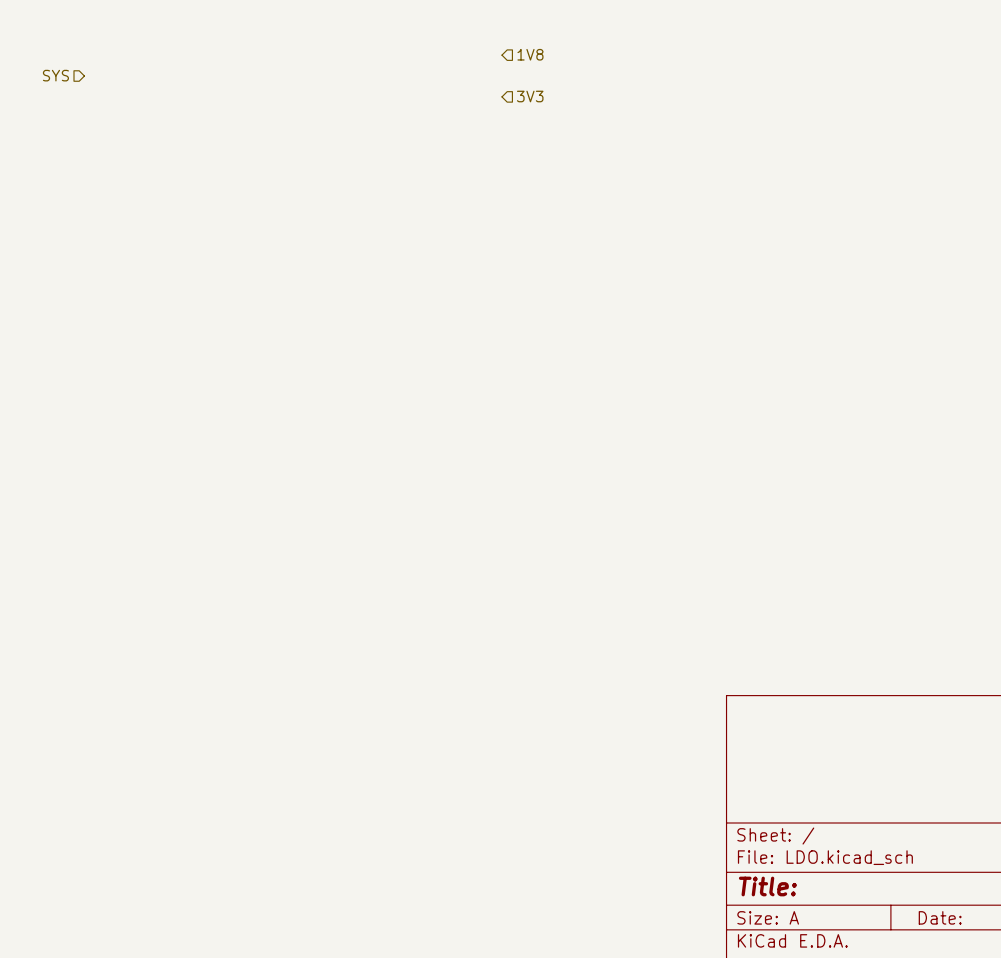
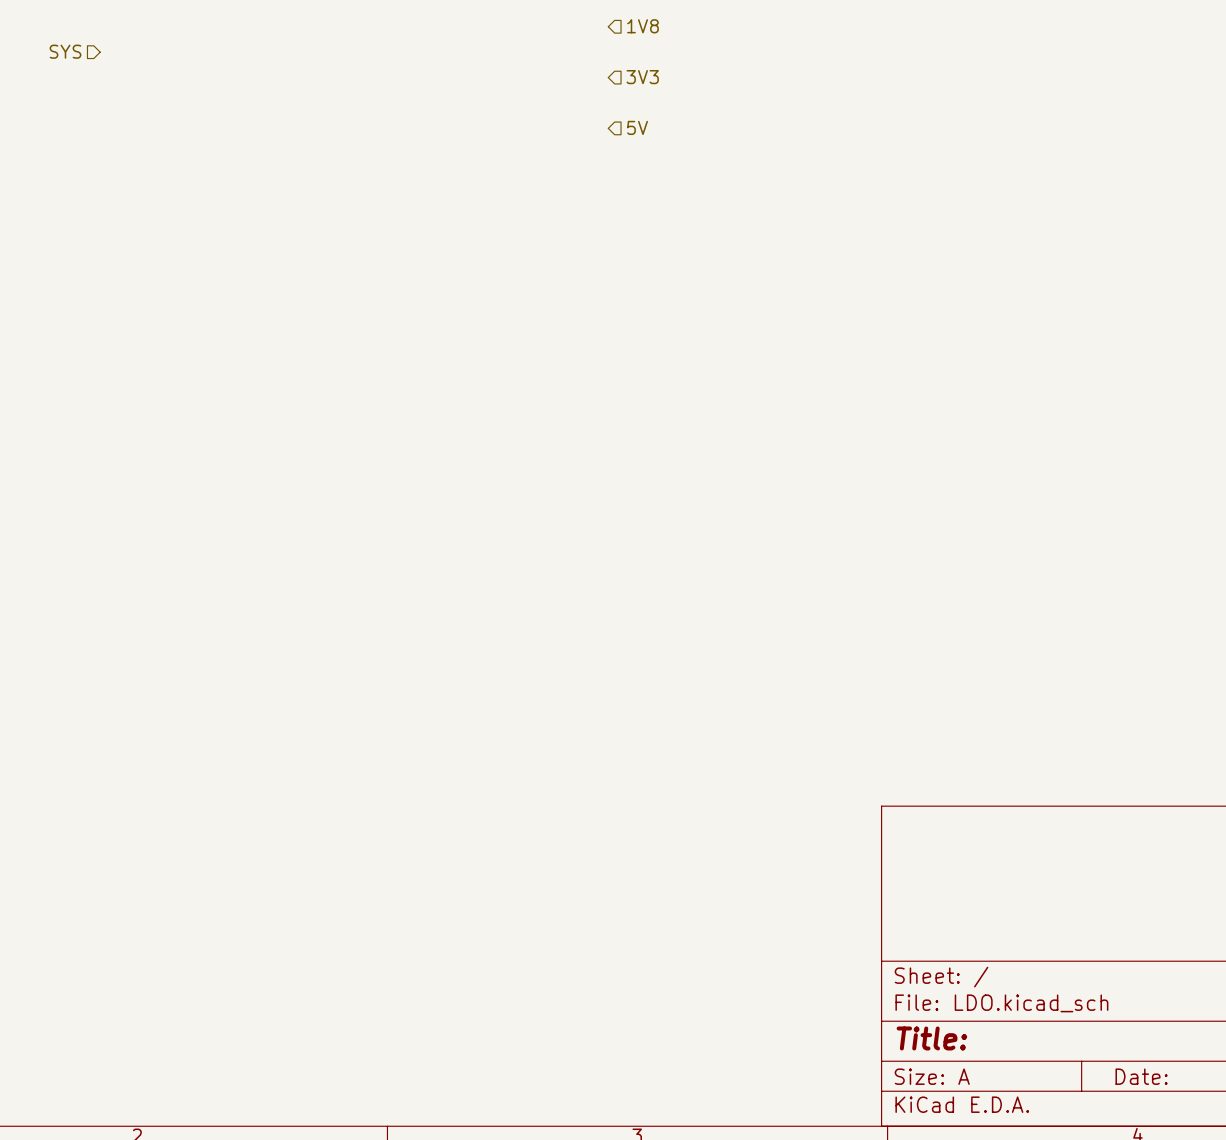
hierarchical label: none -> 5V (637, 127)

